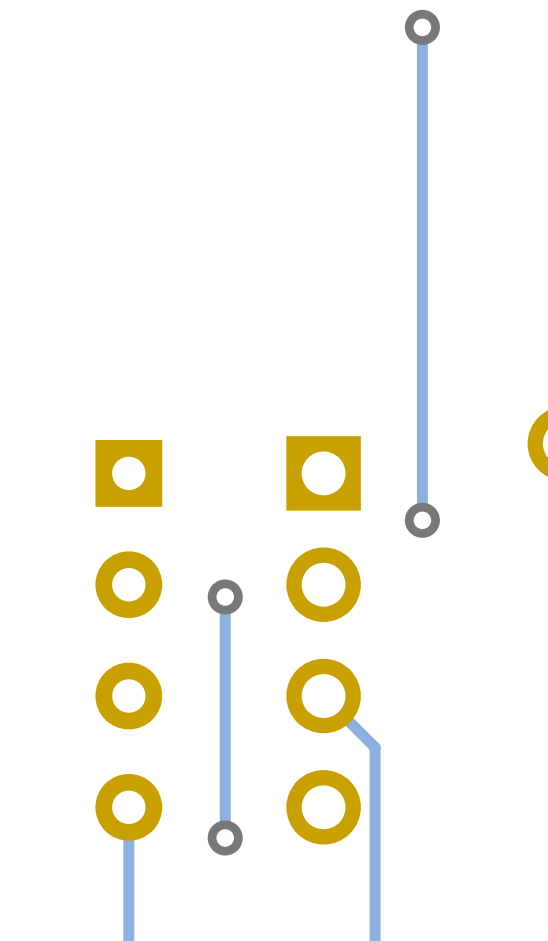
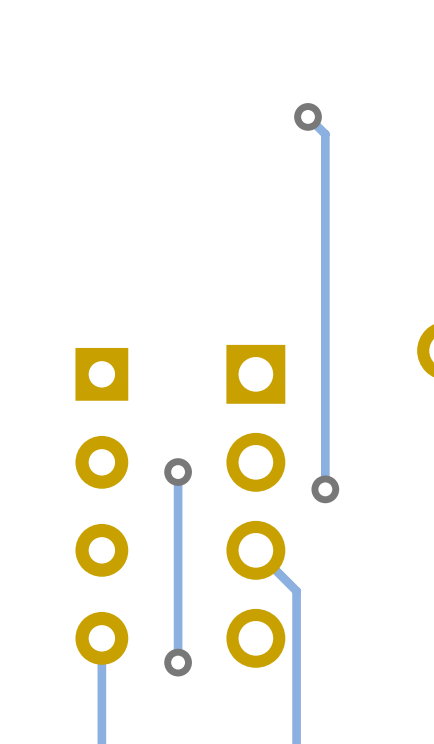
track: (422, 27) (422, 520) -> none
via: (422, 27) -> none
track: none -> (308, 116) (325, 134) (325, 489)
via: none -> (308, 116)
via position: (422, 520) -> (325, 489)

